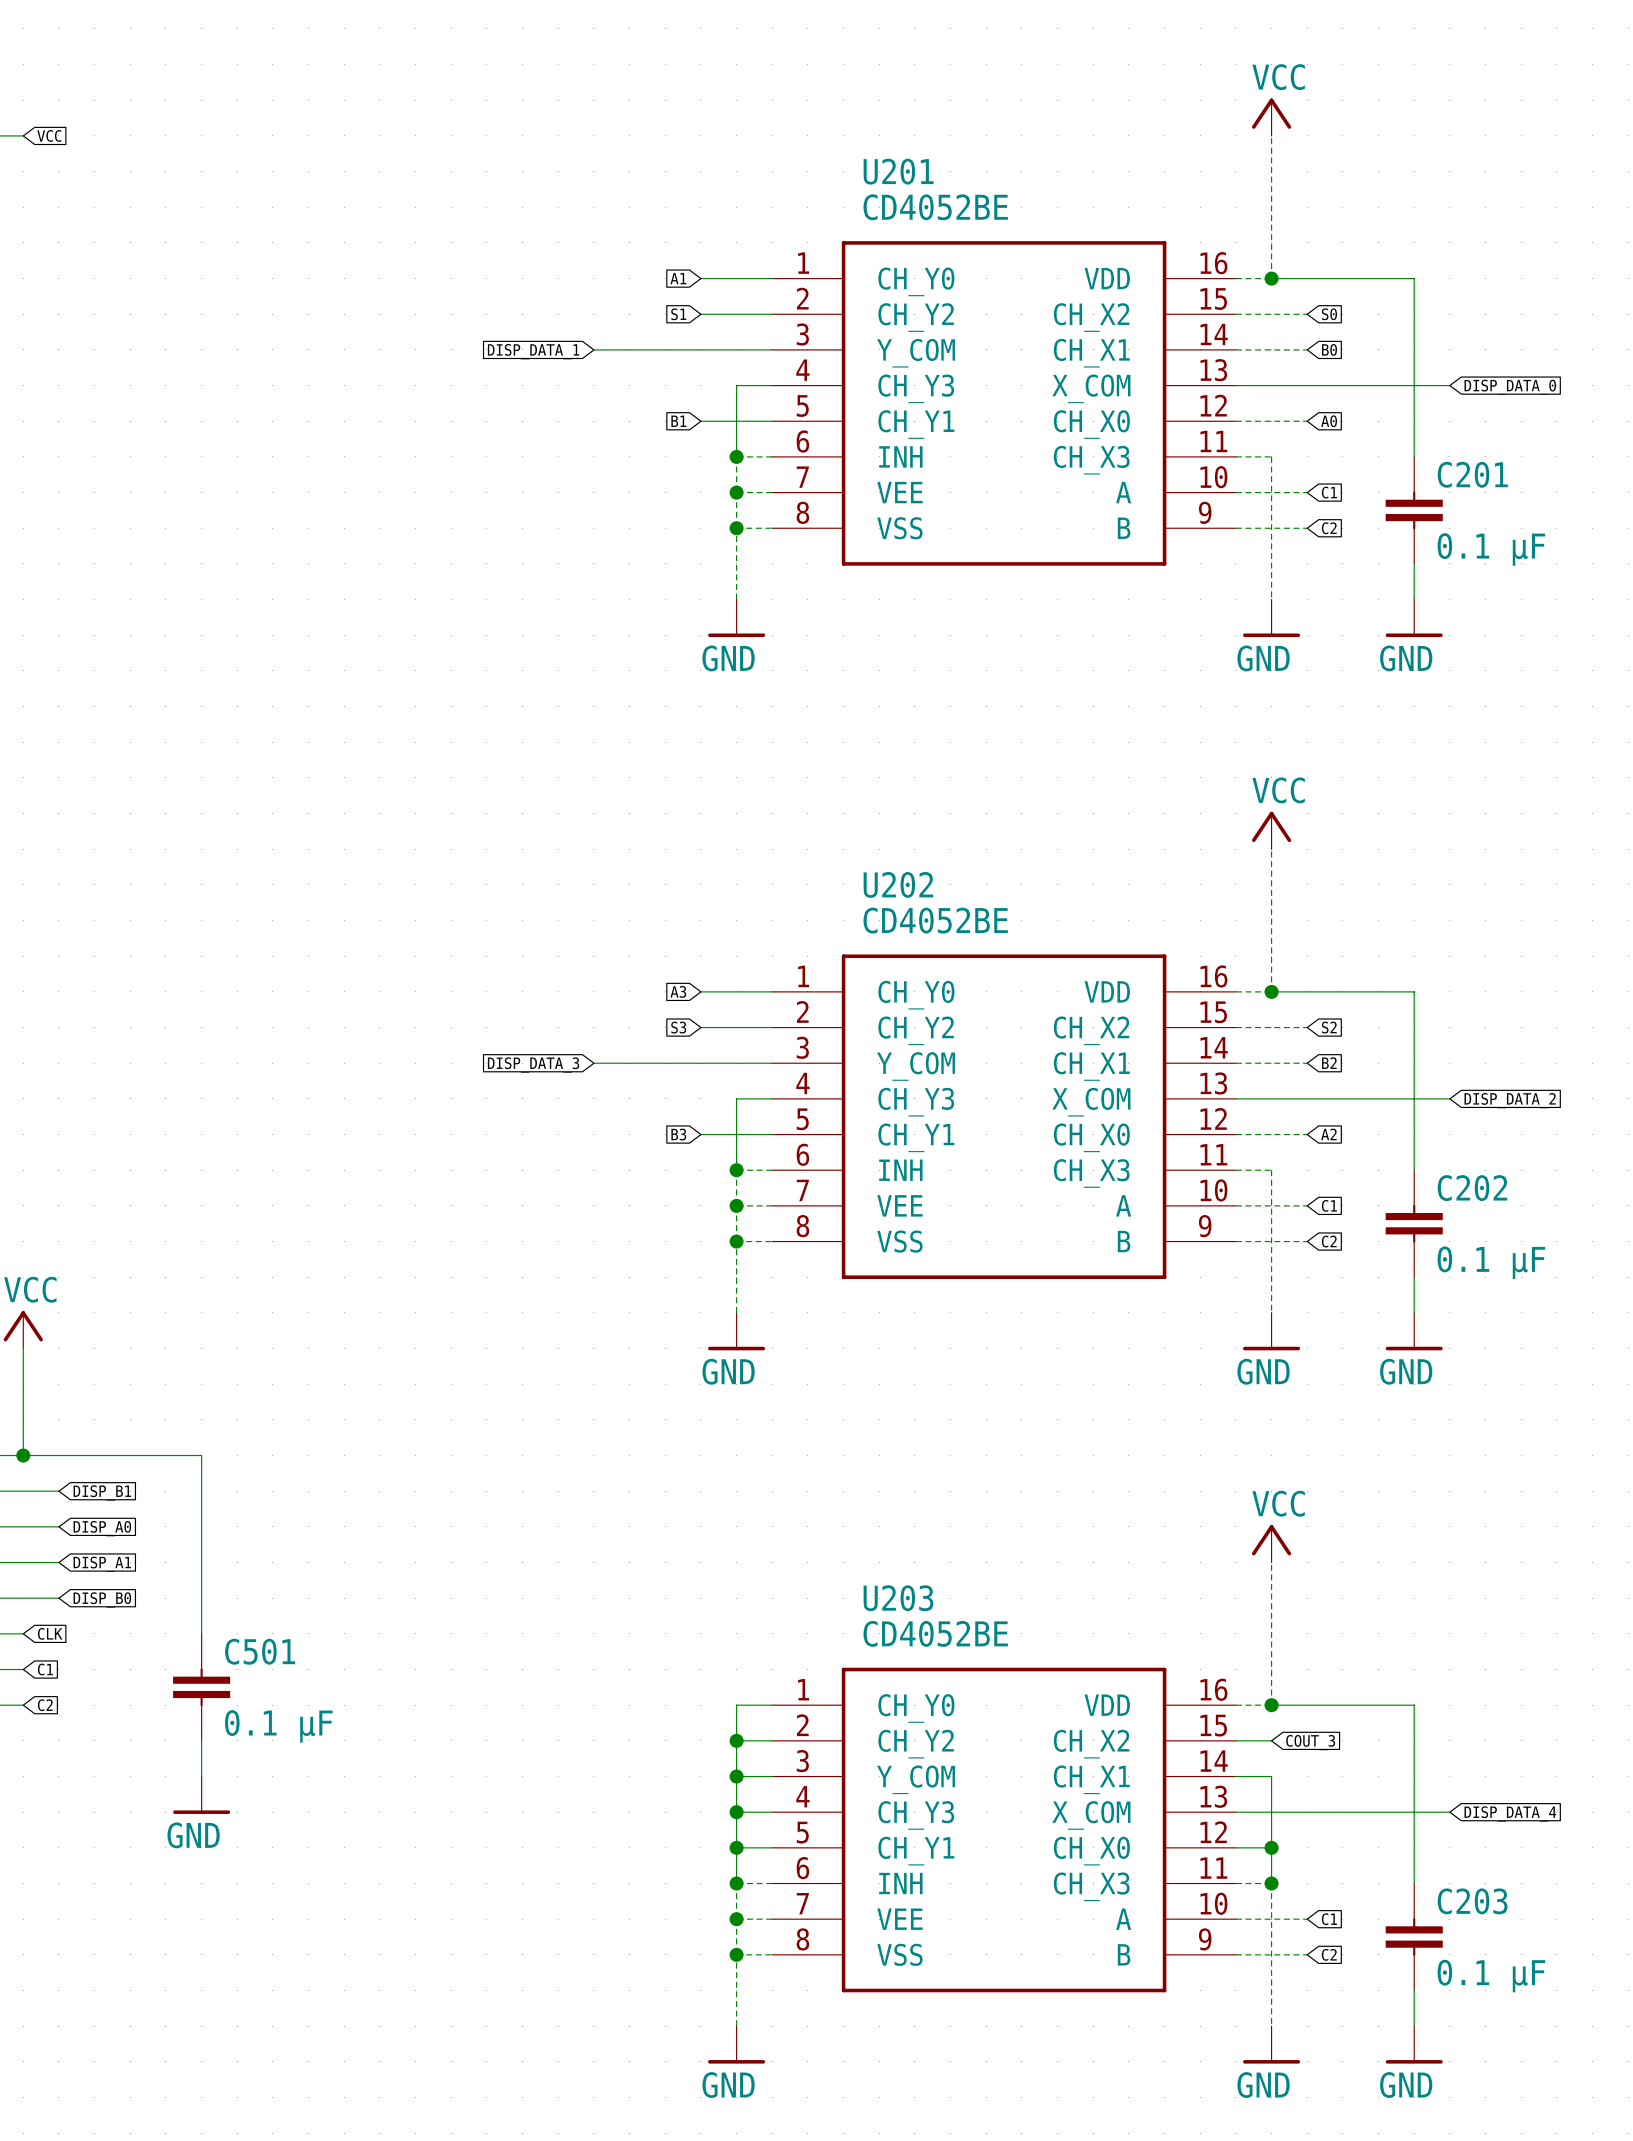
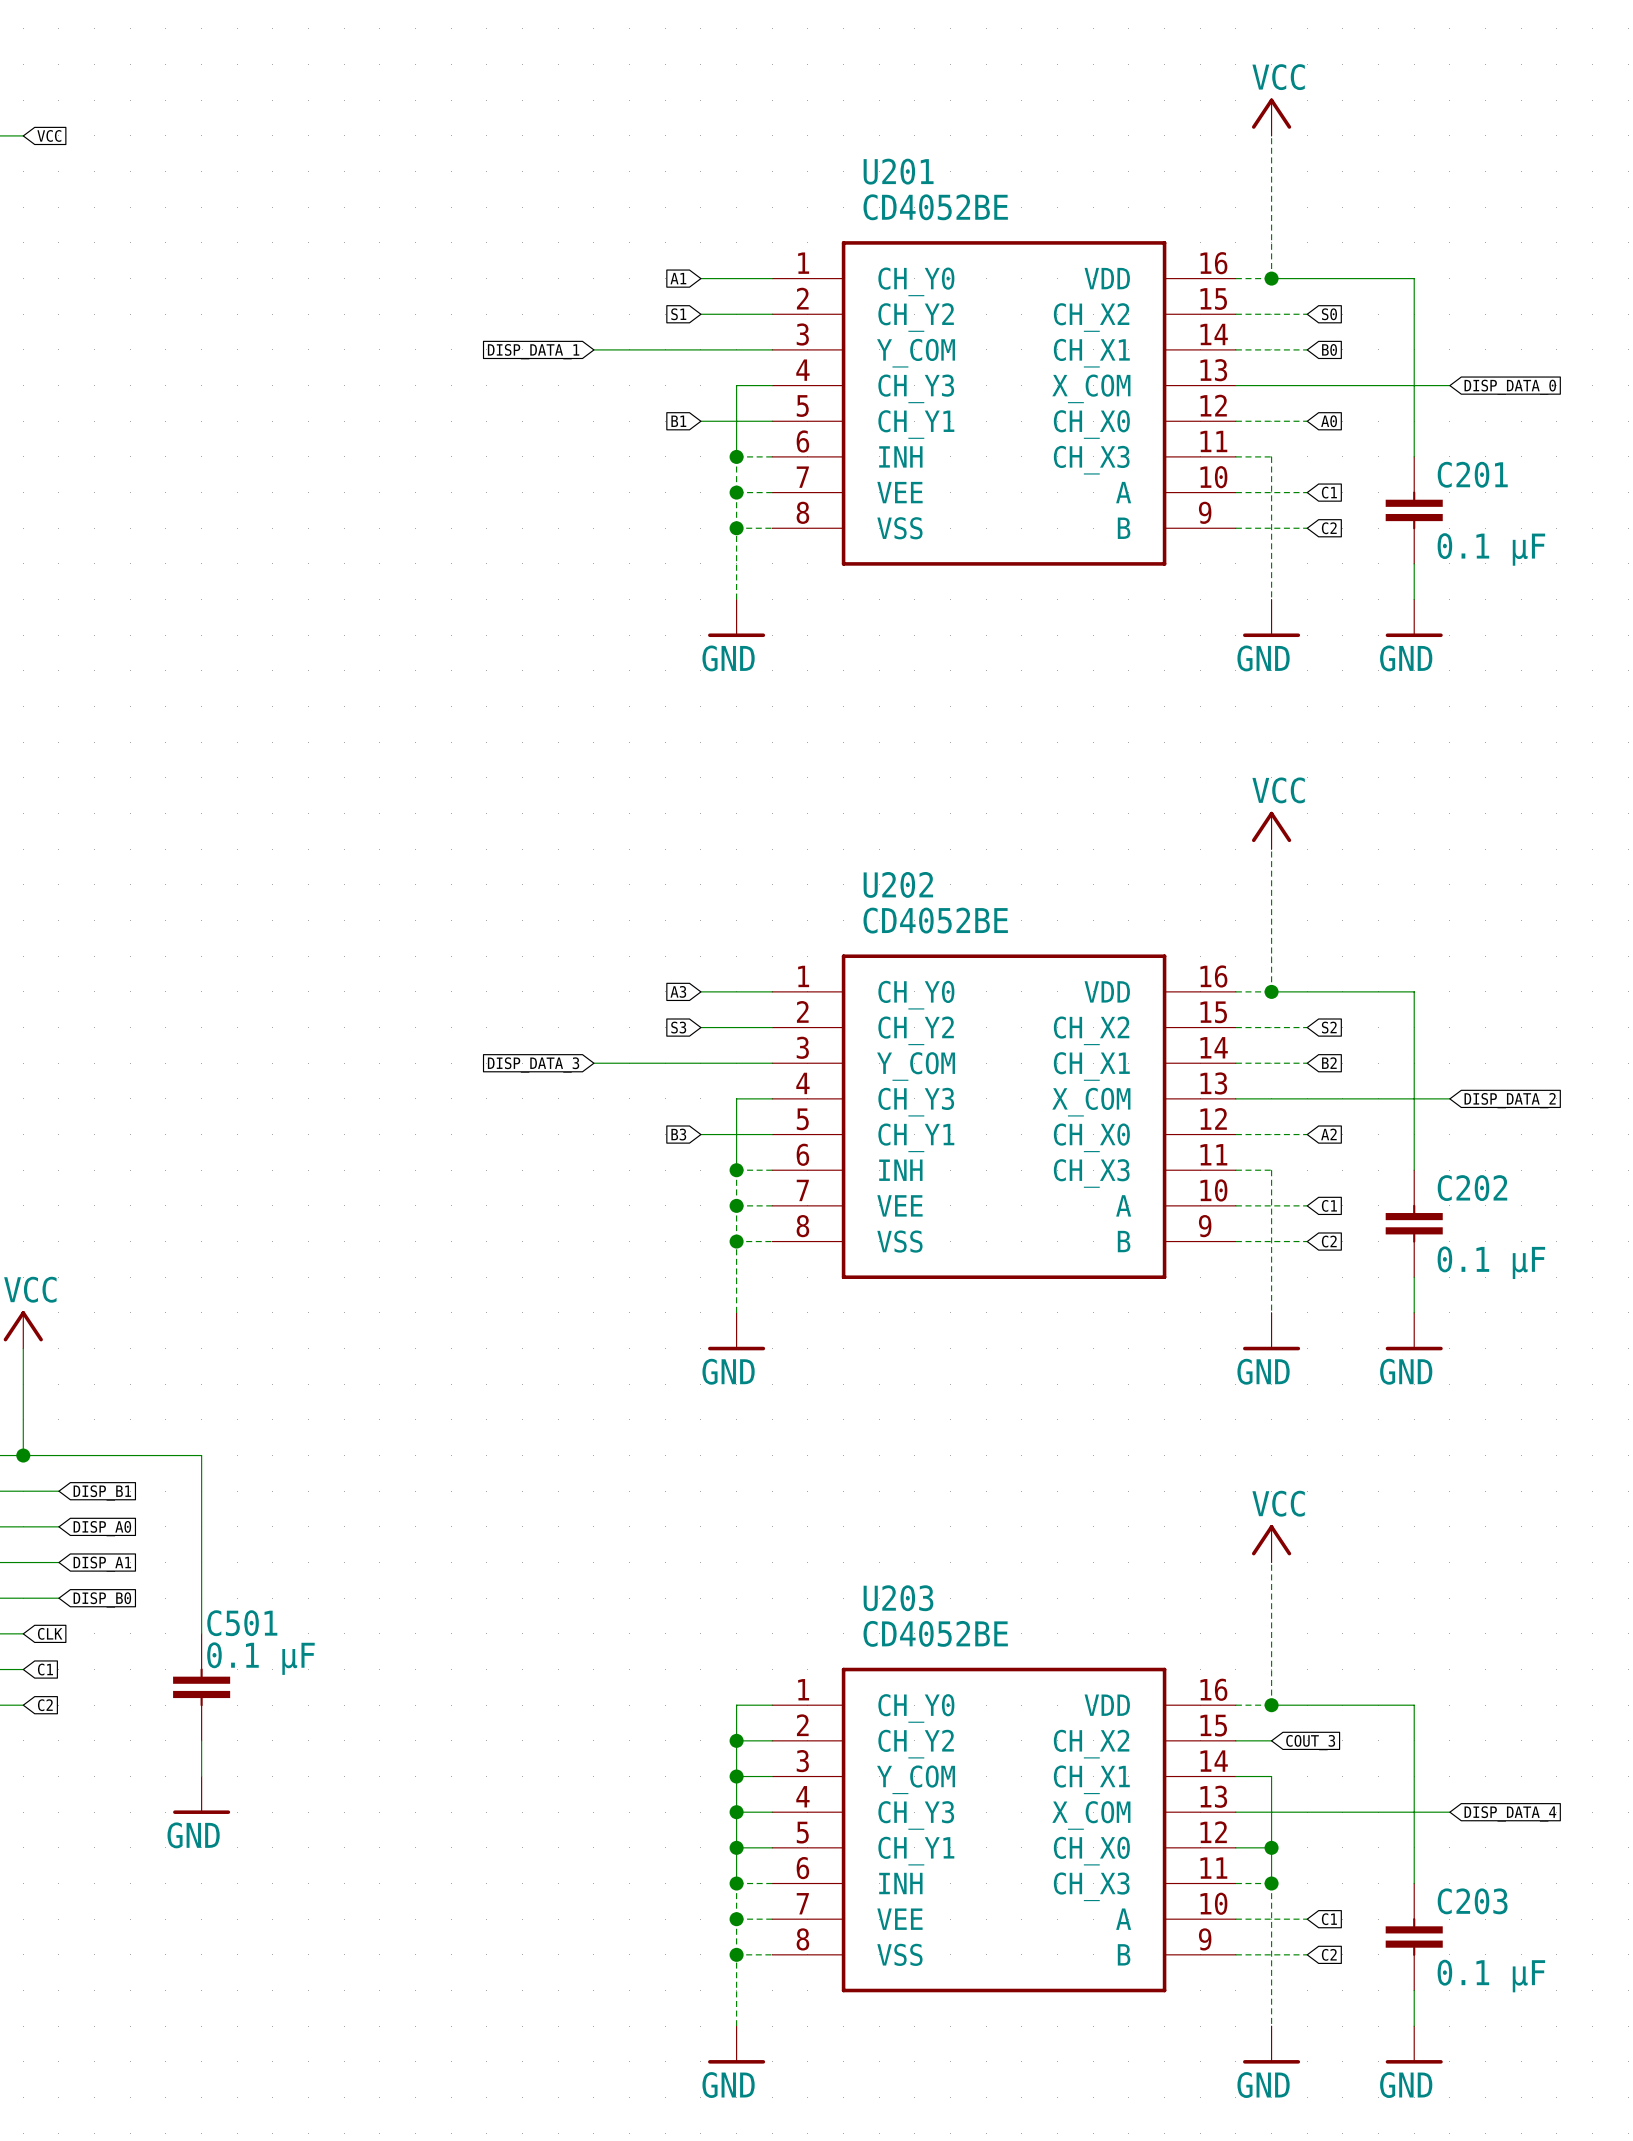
C501 name position: C501 (260, 1651) -> C501 (242, 1623)
C501 value position: 0.1 µF (278, 1726) -> 0.1 µF (260, 1658)

